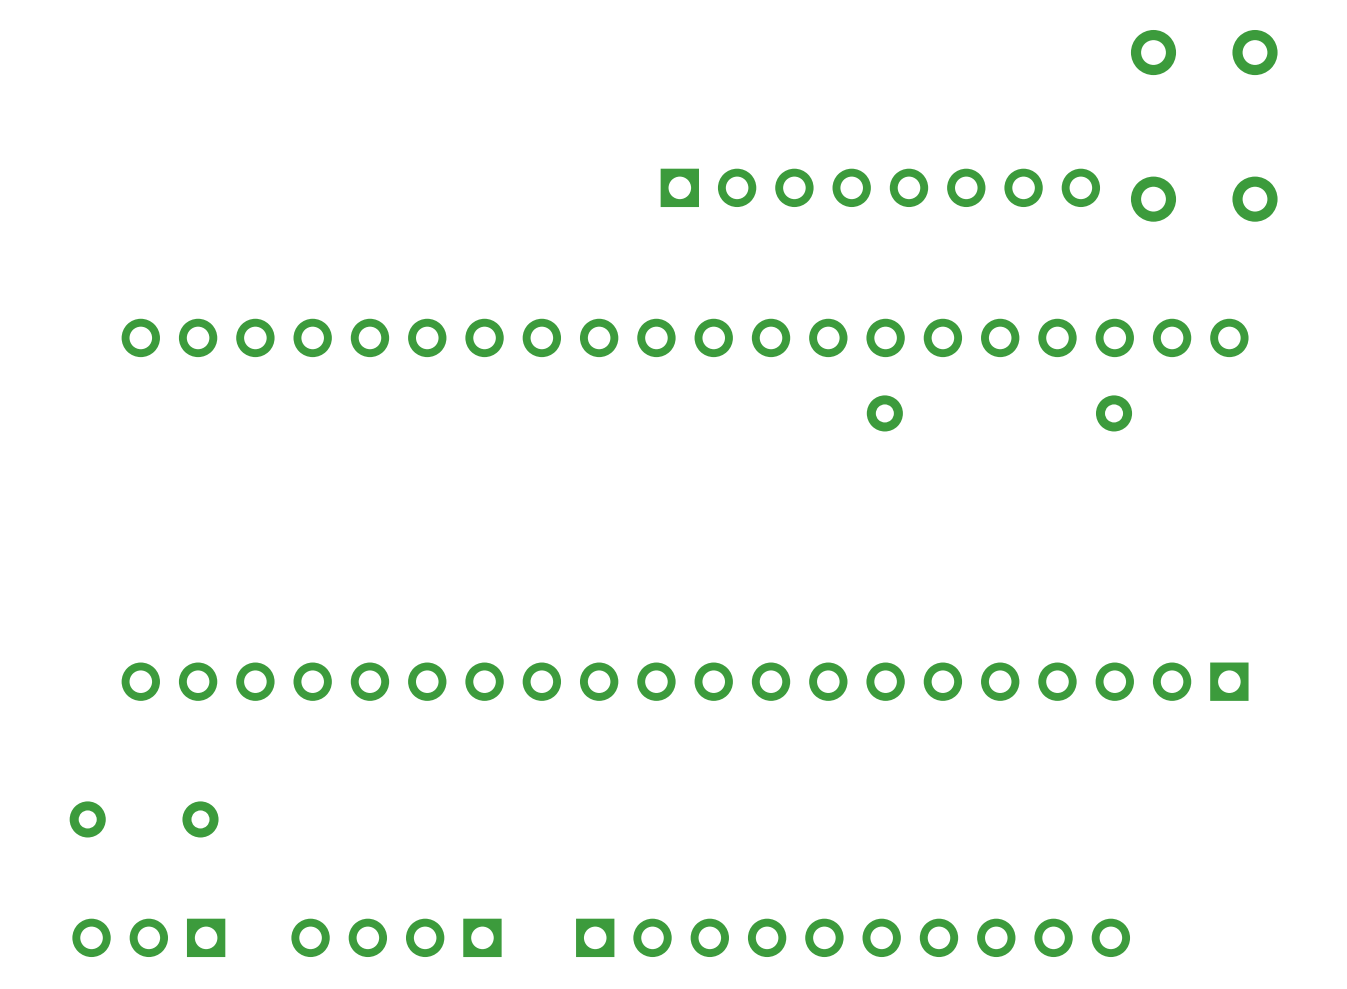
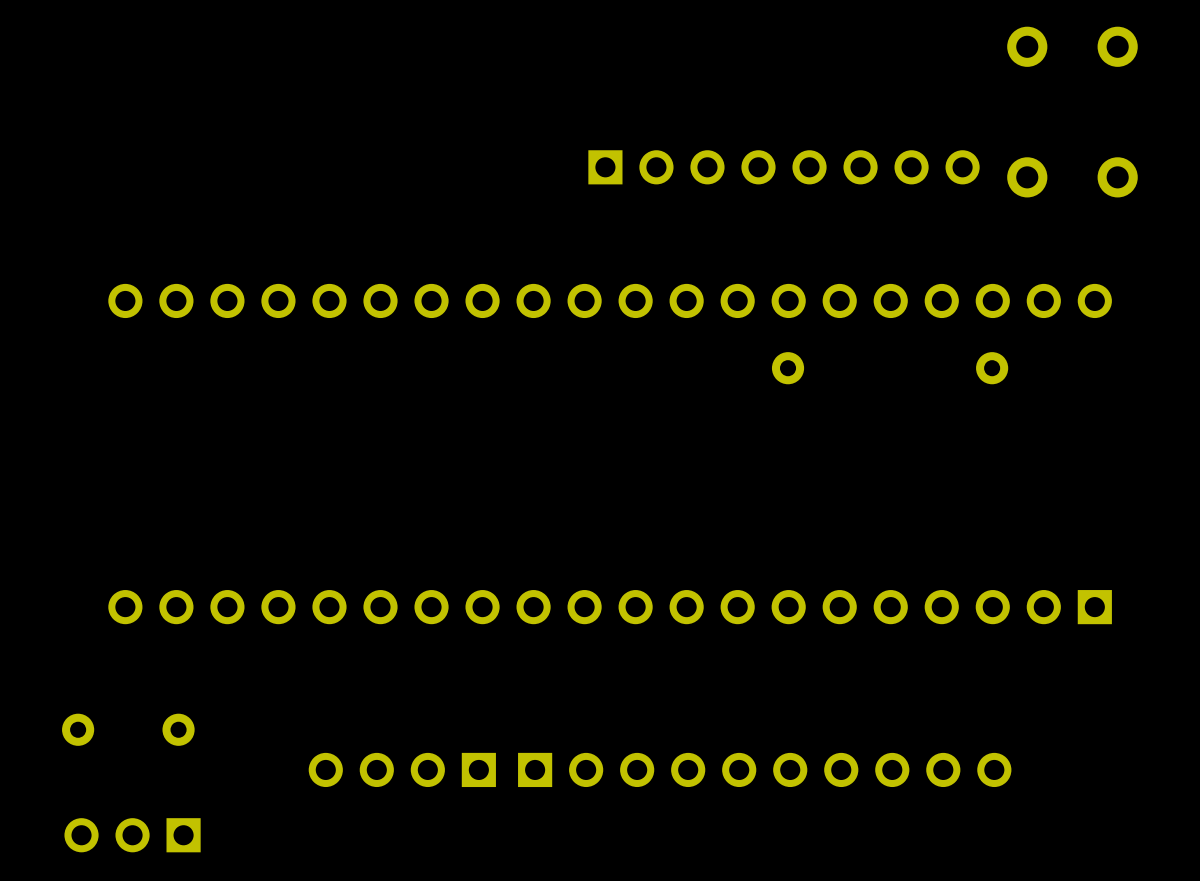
part position: (396, 937) -> (402, 769)
part position: (853, 937) -> (764, 769)

